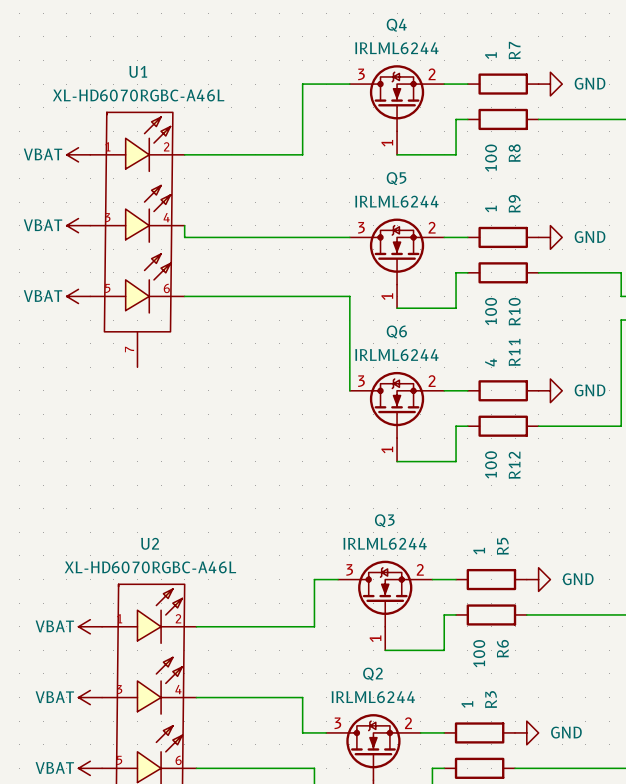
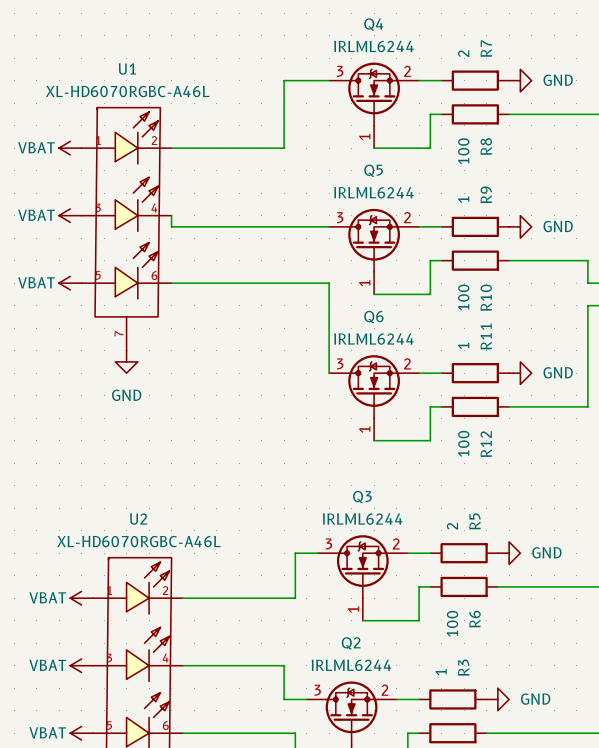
R7 value: 1 (490, 55) -> 2 (463, 53)
R11 value: 4 (490, 362) -> 1 (463, 346)
power symbol: none -> GND (126, 361)
R5 value: 1 (479, 551) -> 2 (452, 526)

